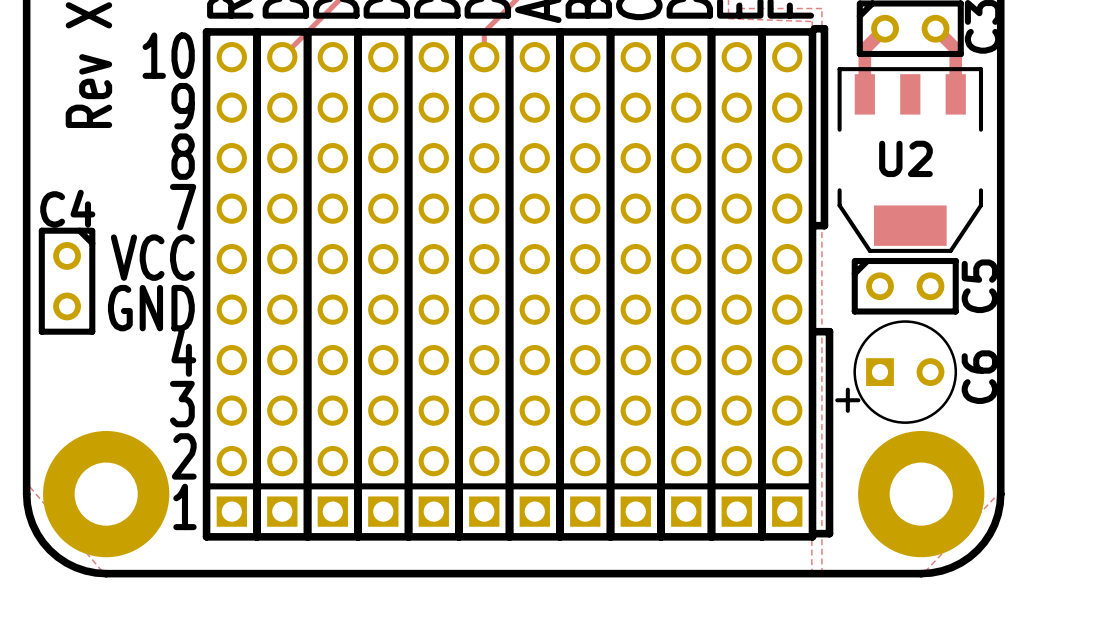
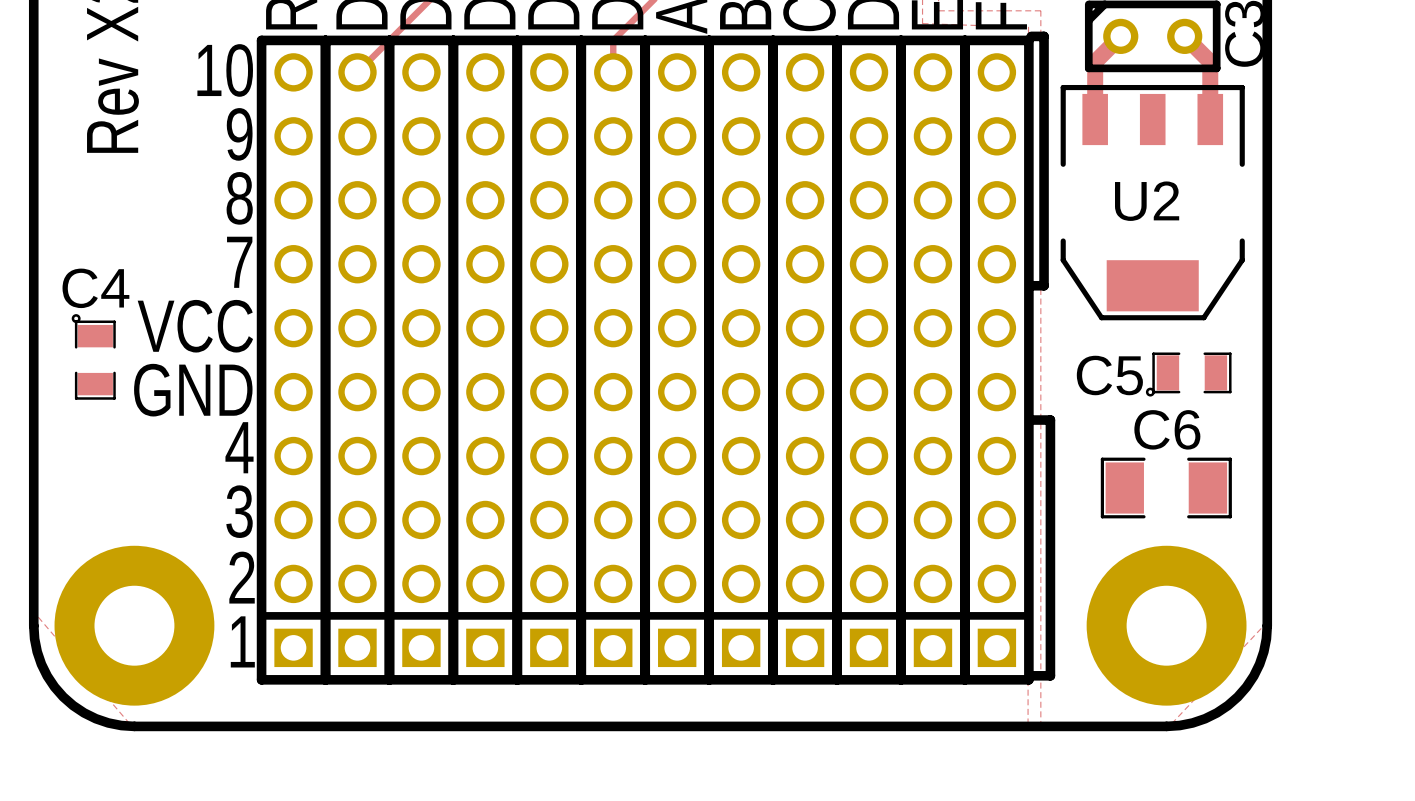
C4 footprint: [38, 227, 96, 335] -> [71, 314, 116, 400]
C5 footprint: [851, 257, 959, 315] -> [1145, 352, 1232, 397]
C5 name position: C5 (979, 286) -> C5 (1109, 375)
C6 footprint: [853, 320, 958, 424] -> [1100, 457, 1232, 519]
C6 name position: C6 (979, 377) -> C6 (1167, 429)

